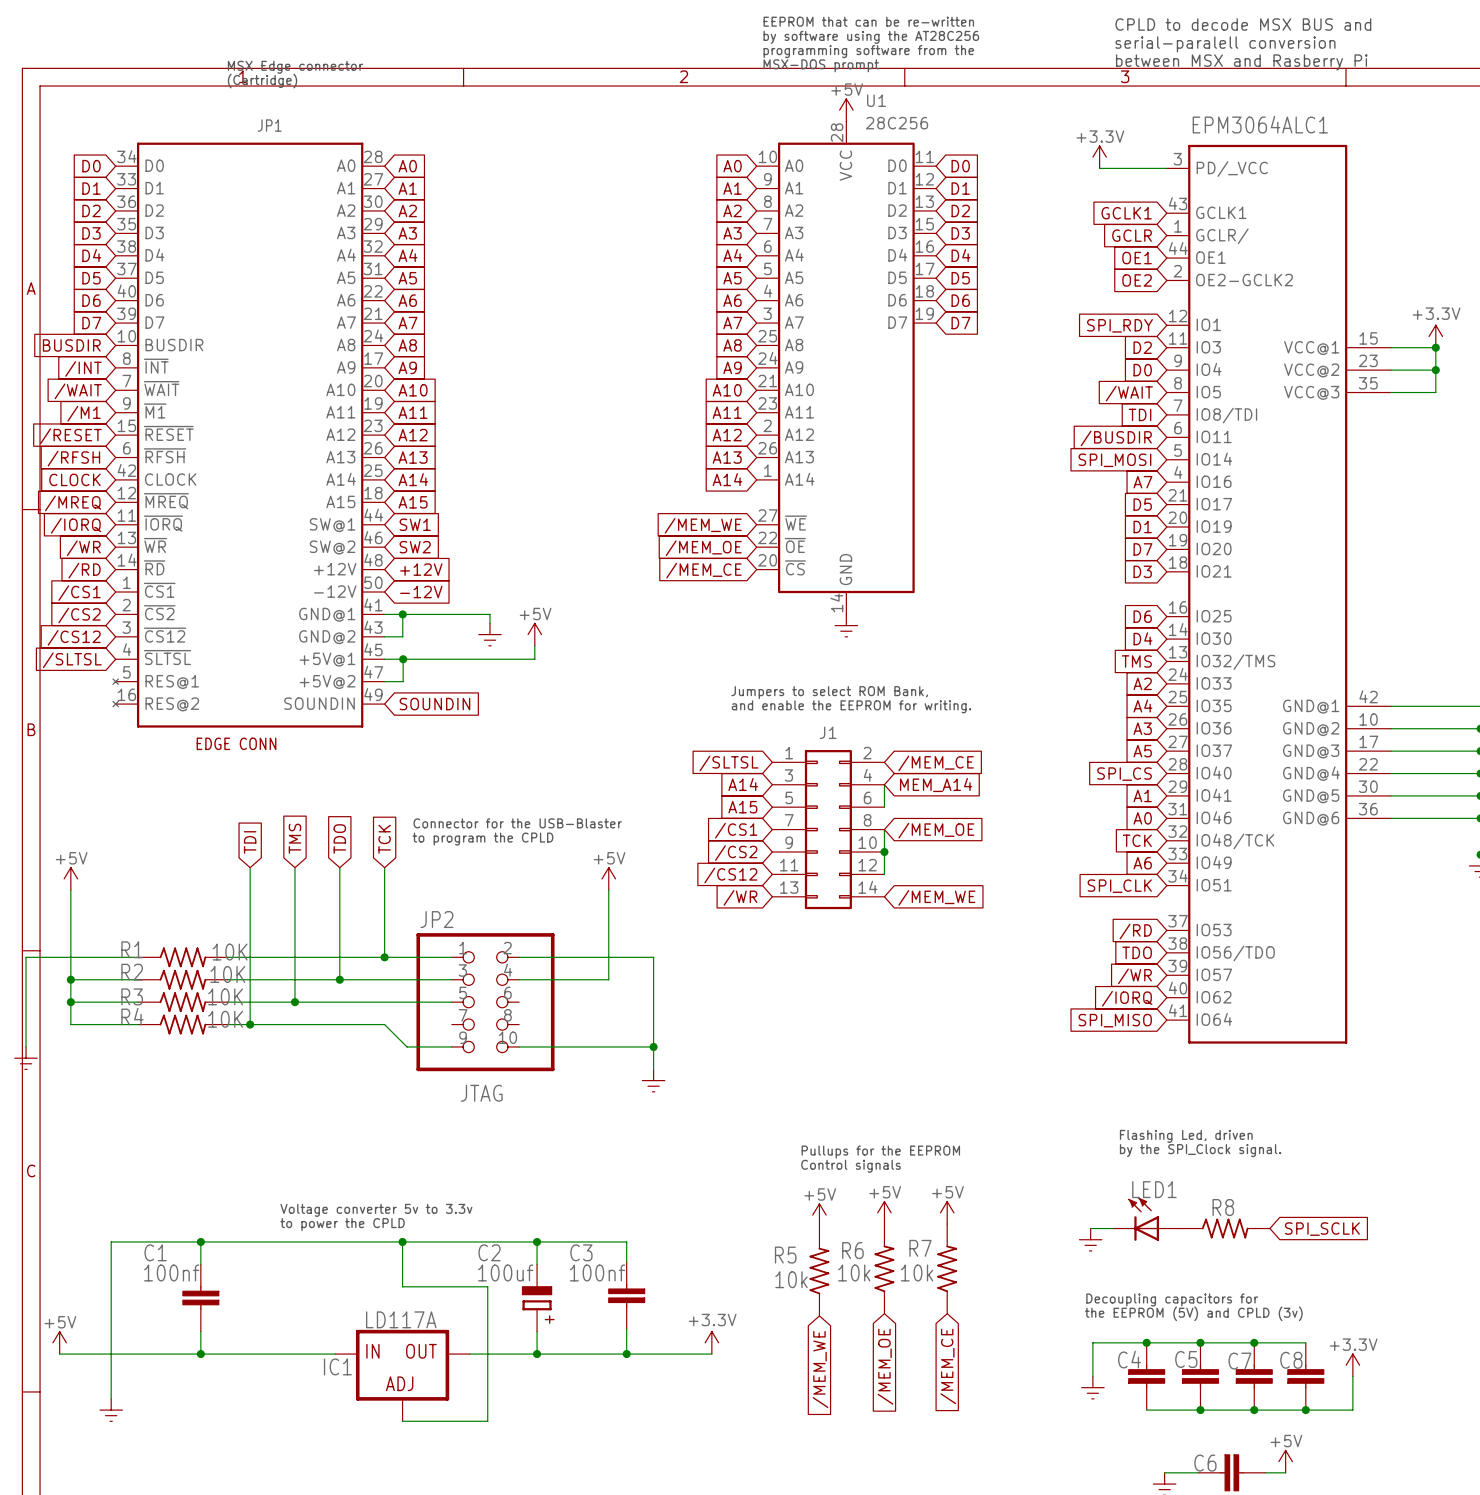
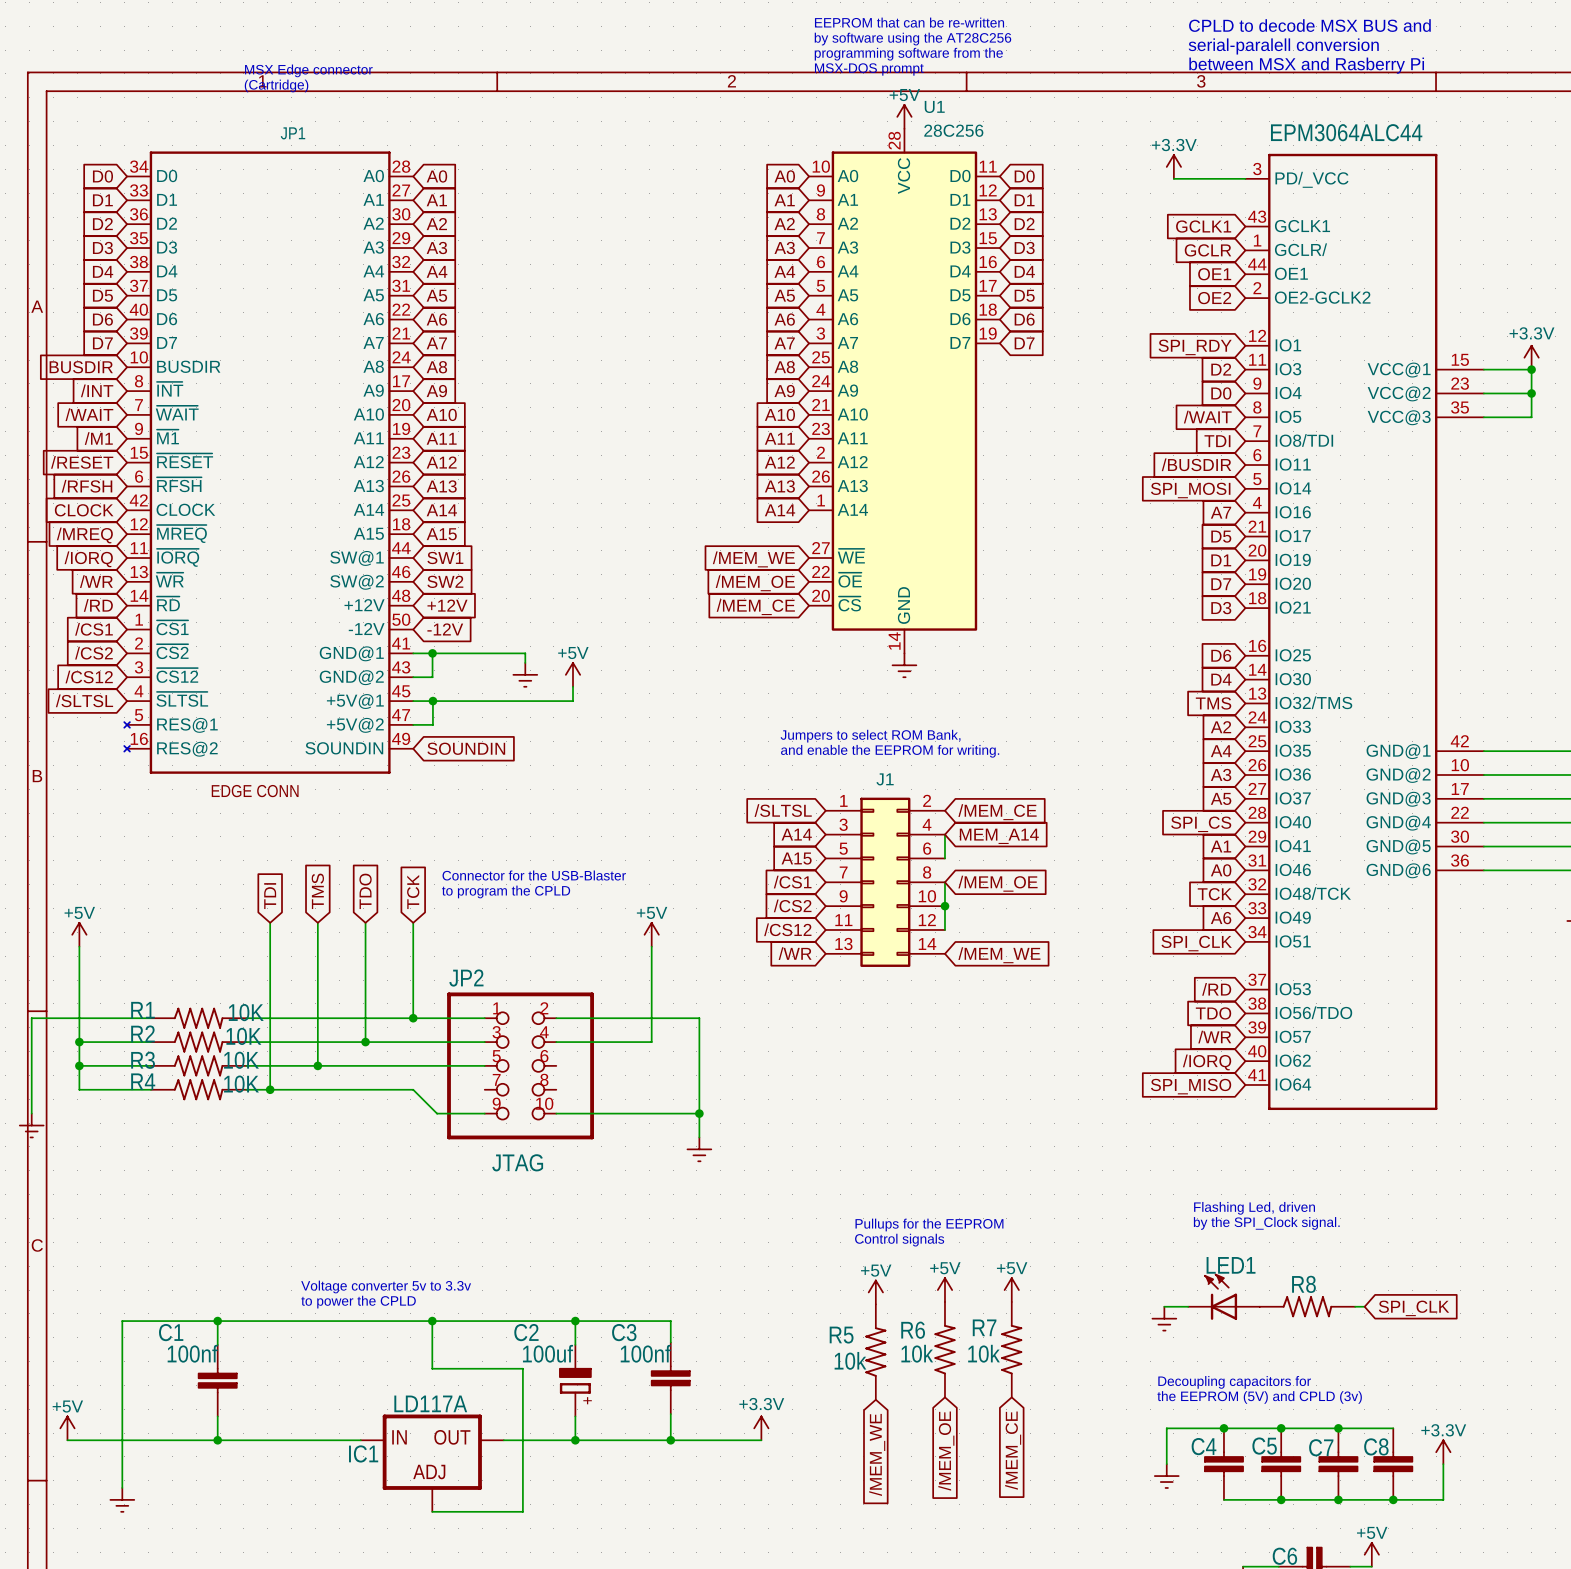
EPM3064ALC1 name: EPM3064ALC1 (1260, 124) -> EPM3064ALC44 (1346, 132)
wire: none -> (1355, 1306) (1364, 1306)
global label: SPI_SCLK (1322, 1229) -> SPI_CLK (1414, 1308)

